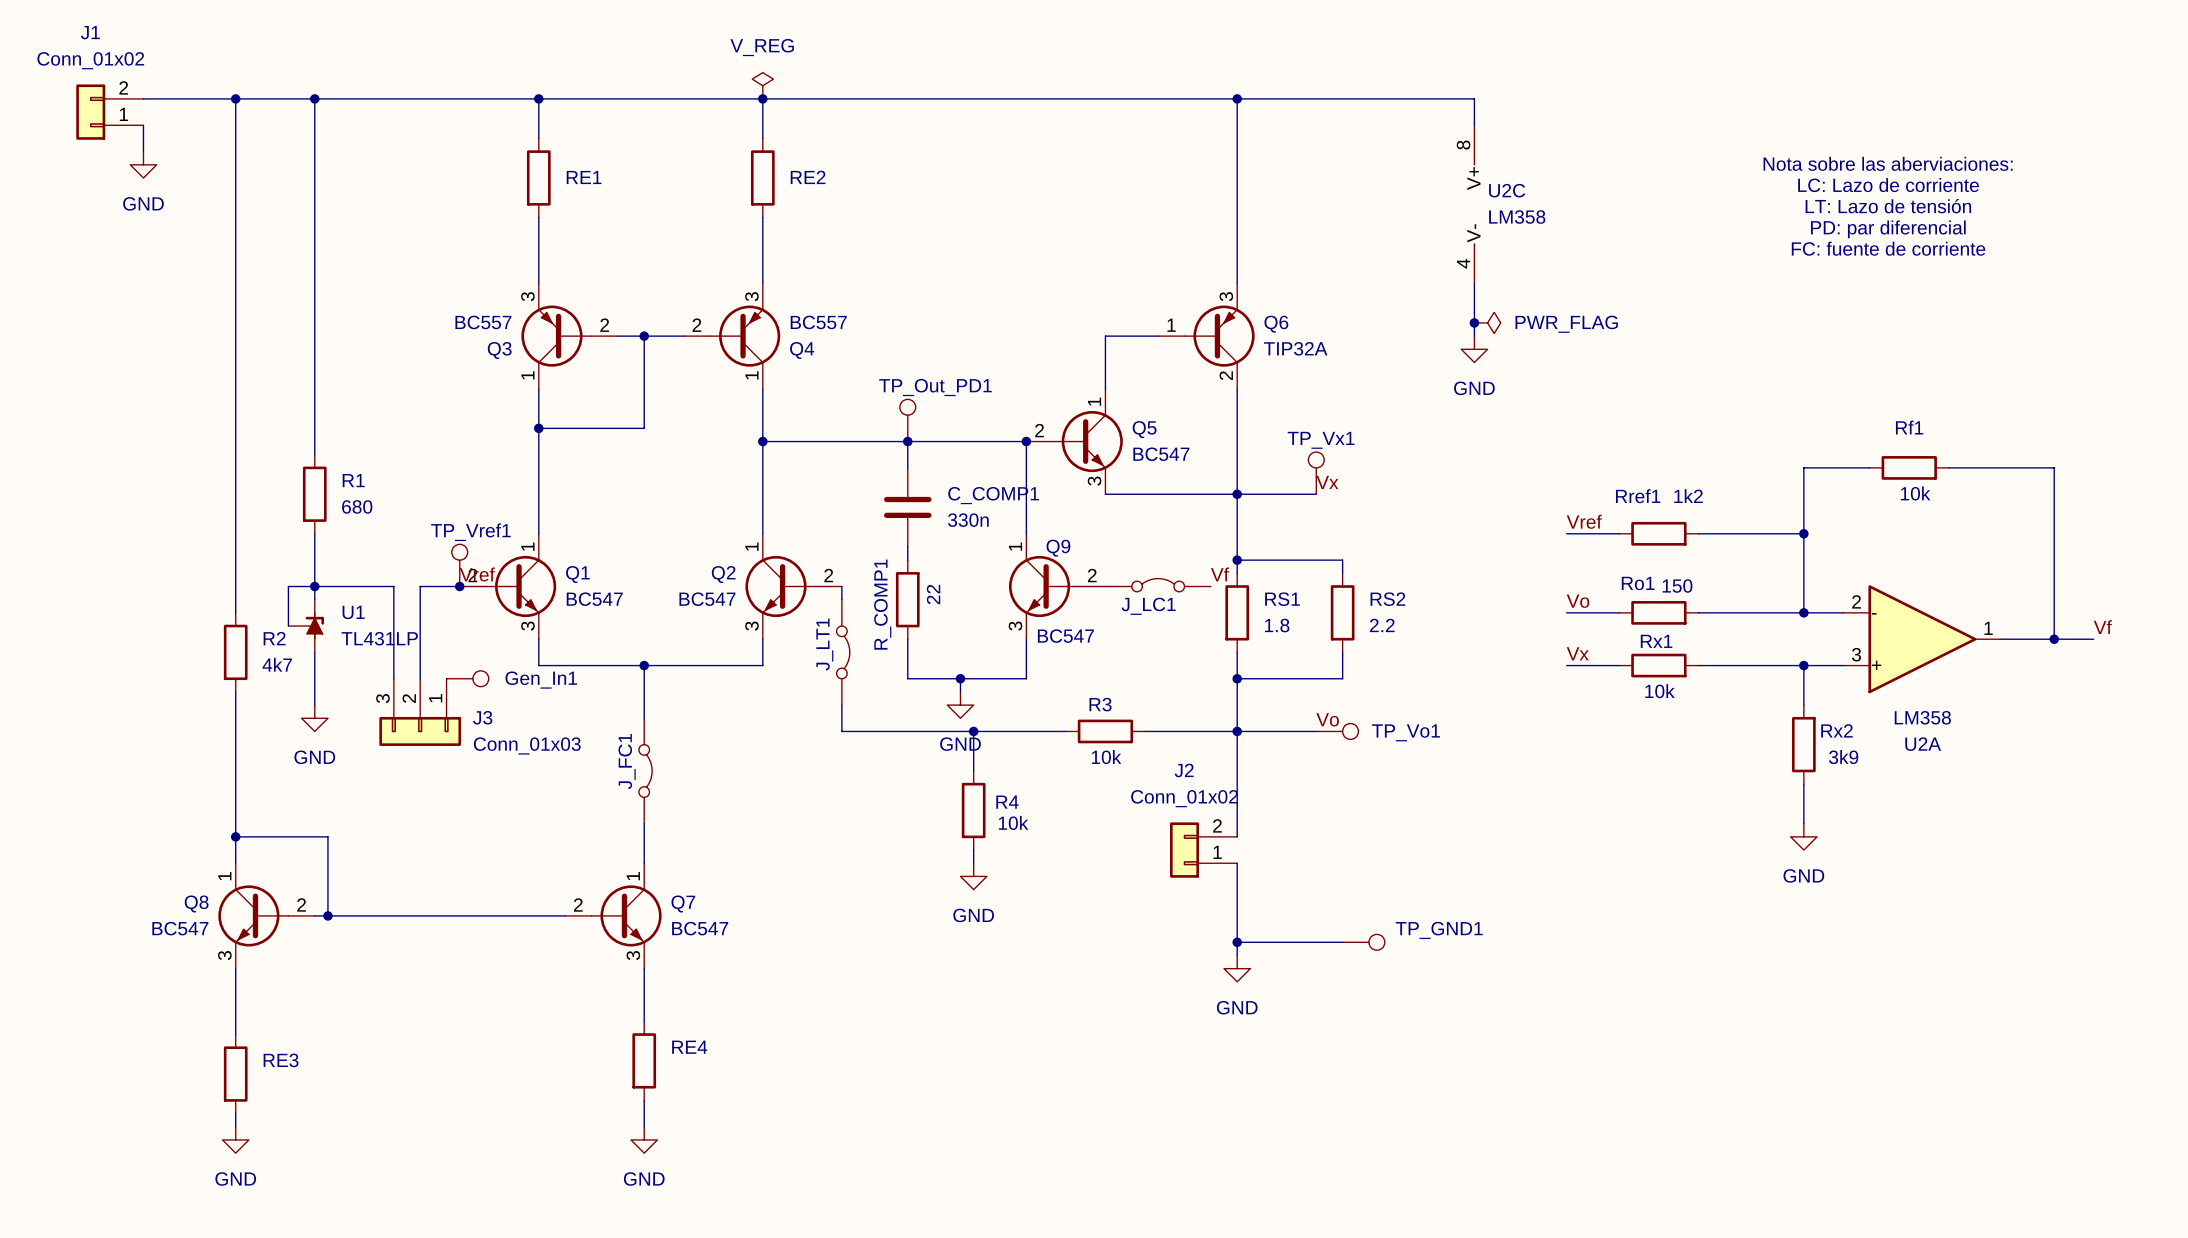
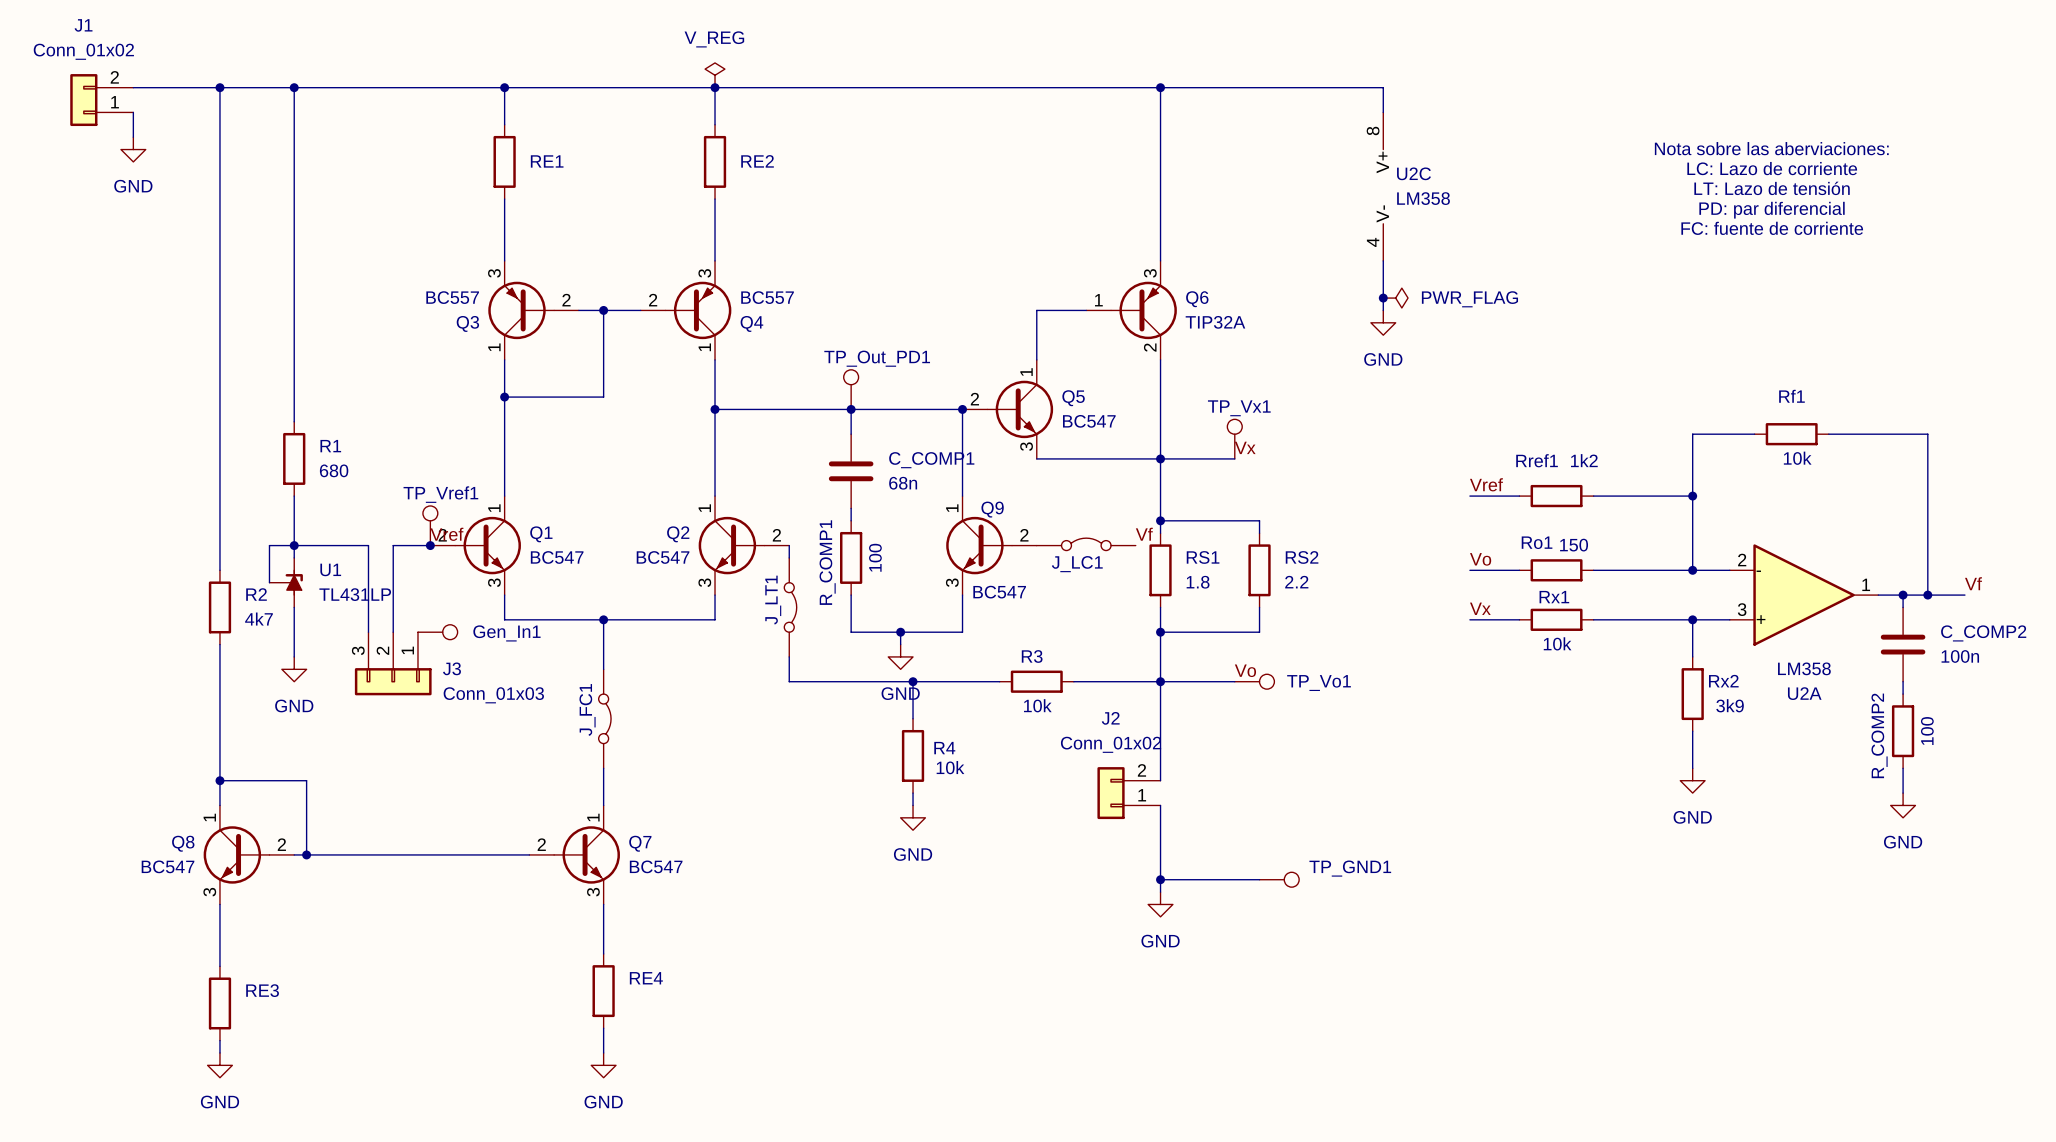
C_COMP1 value: 330n (968, 520) -> 68n (903, 483)
R_COMP1 value: 22 (933, 594) -> 100 (875, 557)
wire: none -> (1903, 595) (1903, 607)
junction: none -> (1903, 595)
C_COMP2: none -> 100n (1903, 644)
wire: none -> (1903, 681) (1903, 694)
R_COMP2: none -> 100 (1903, 731)
wire: none -> (1903, 768) (1903, 793)
power symbol: none -> GND (1903, 805)

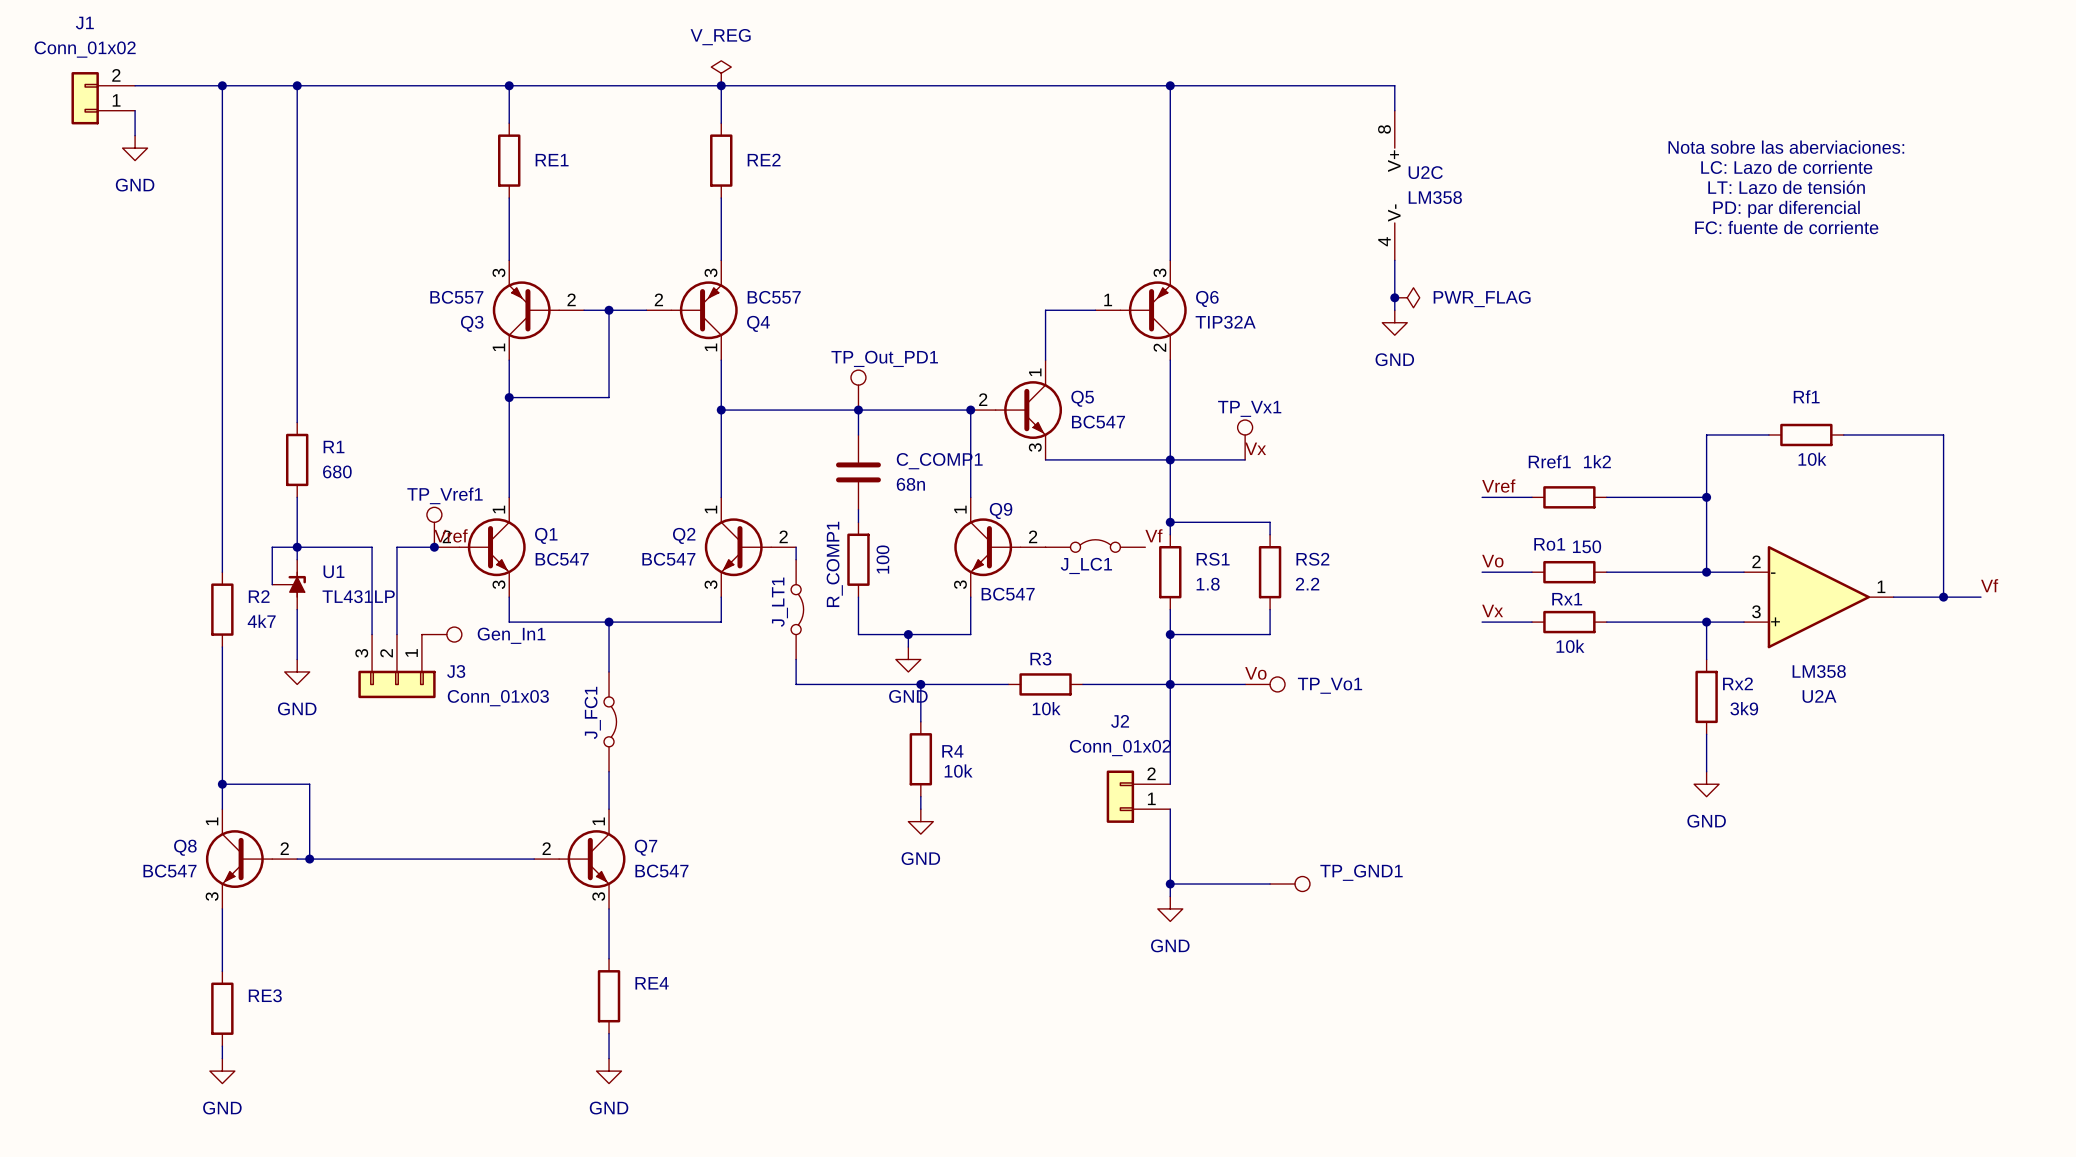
wire: (1903, 595) (1903, 607) -> none
junction: (1903, 595) -> none
C_COMP2: 100n (1903, 644) -> none
wire: (1903, 681) (1903, 694) -> none
R_COMP2: 100 (1903, 731) -> none
wire: (1903, 768) (1903, 793) -> none
power symbol: GND (1903, 805) -> none

